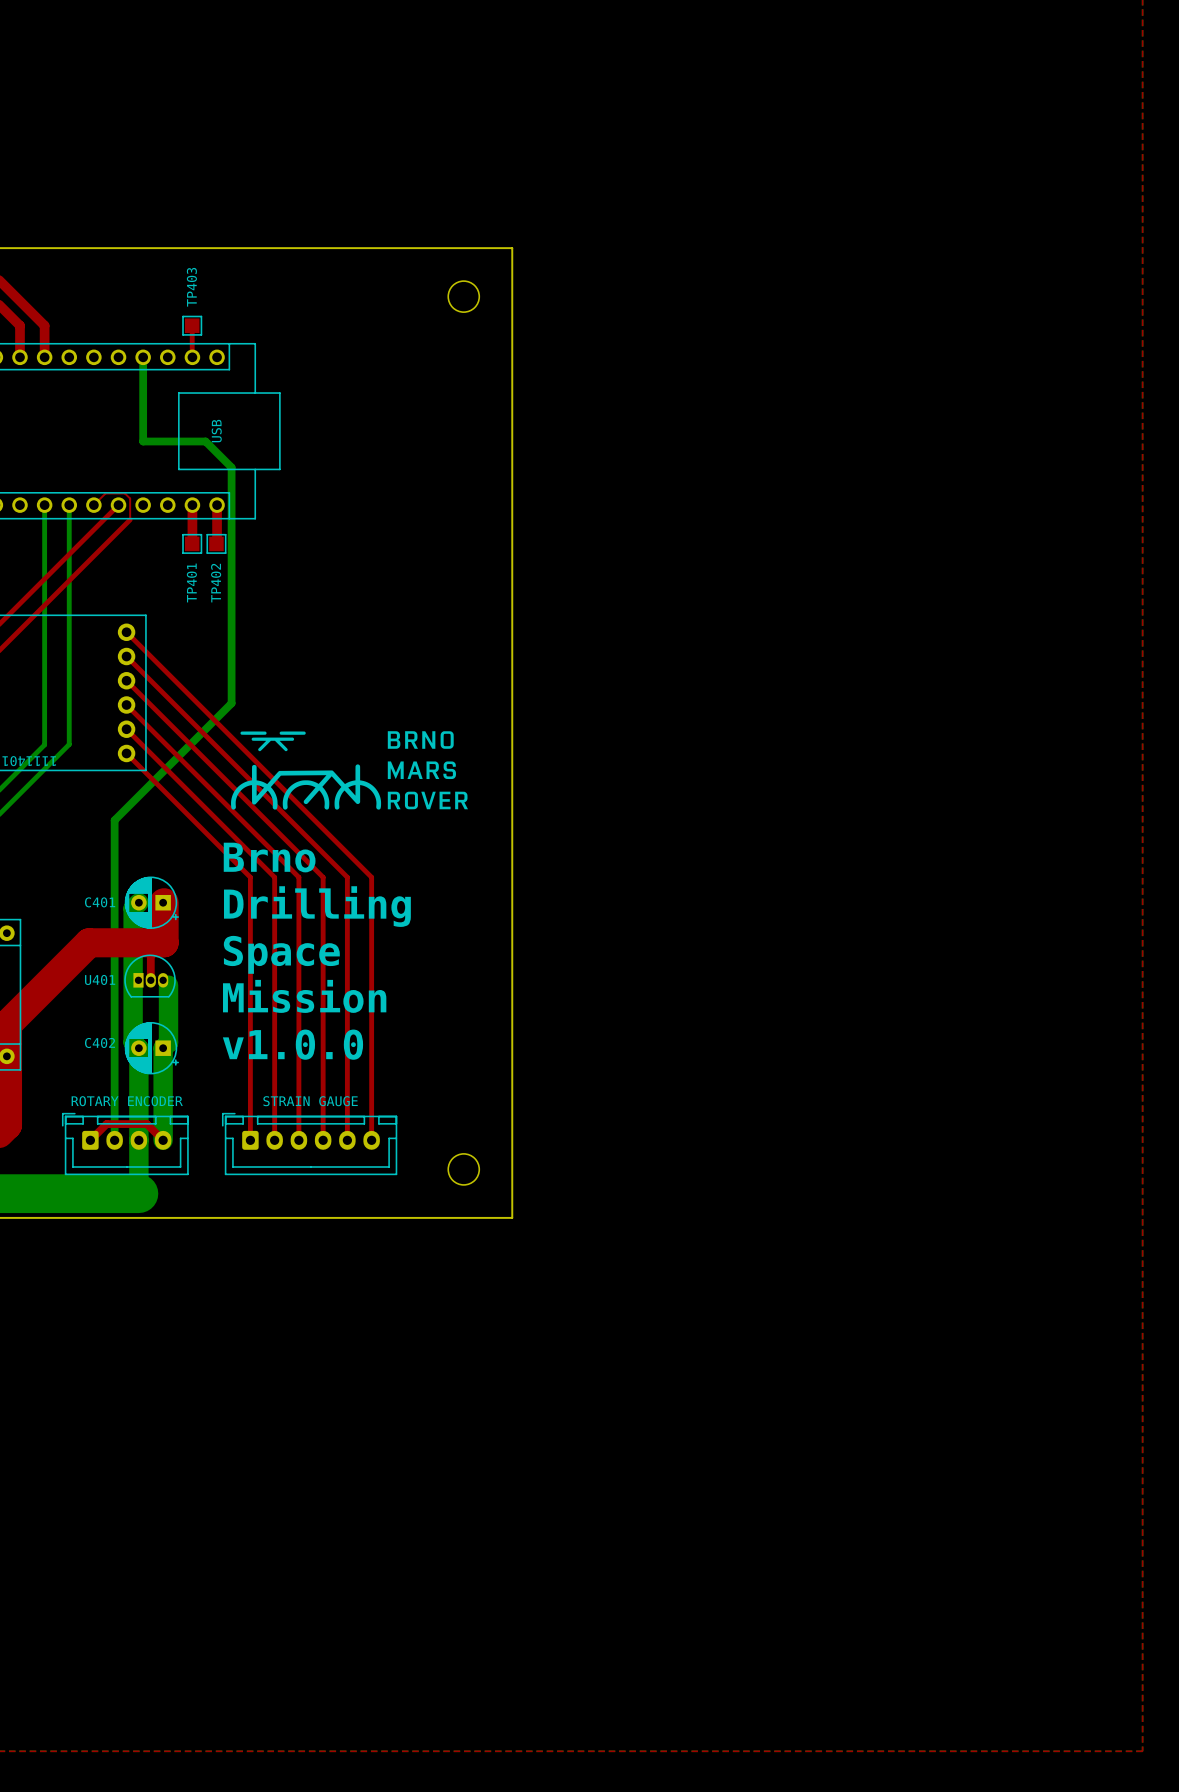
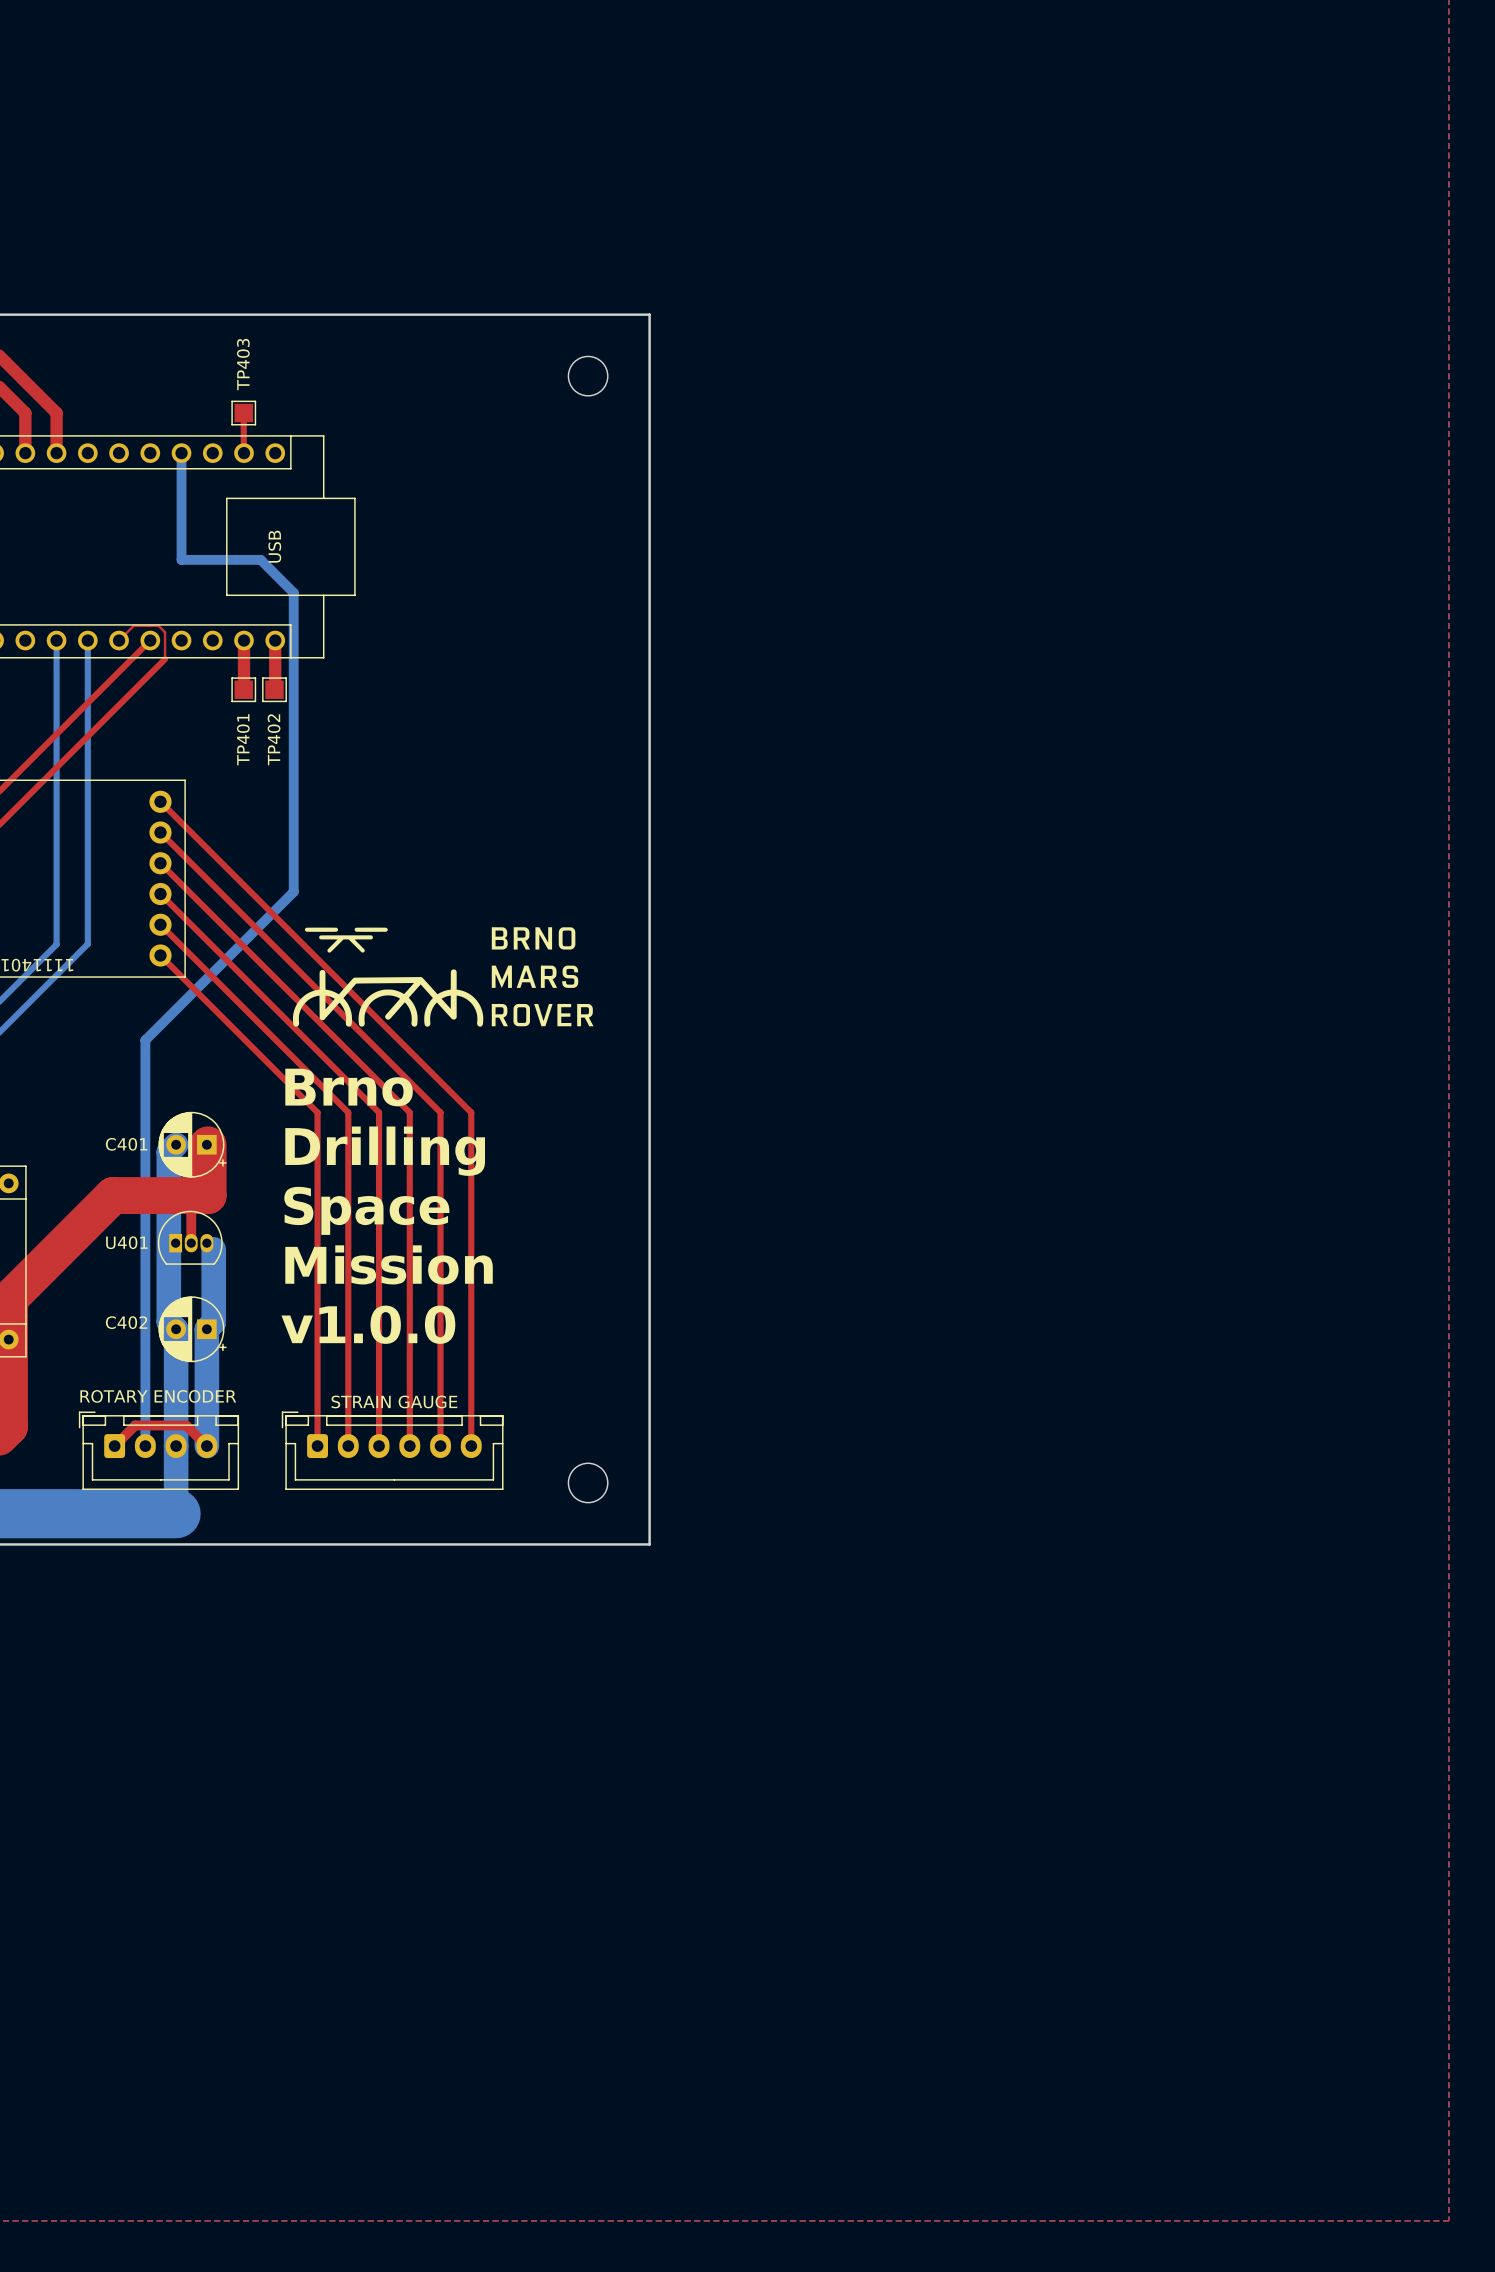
ROTARY ENCODER name: none -> ROTARY ENCODER (158, 1396)
ROTARY ENCODER value: ROTARY ENCODER (127, 1101) -> none
STRAIN GAUGE value: STRAIN GAUGE (310, 1101) -> none
STRAIN GAUGE name: none -> STRAIN GAUGE (394, 1401)

